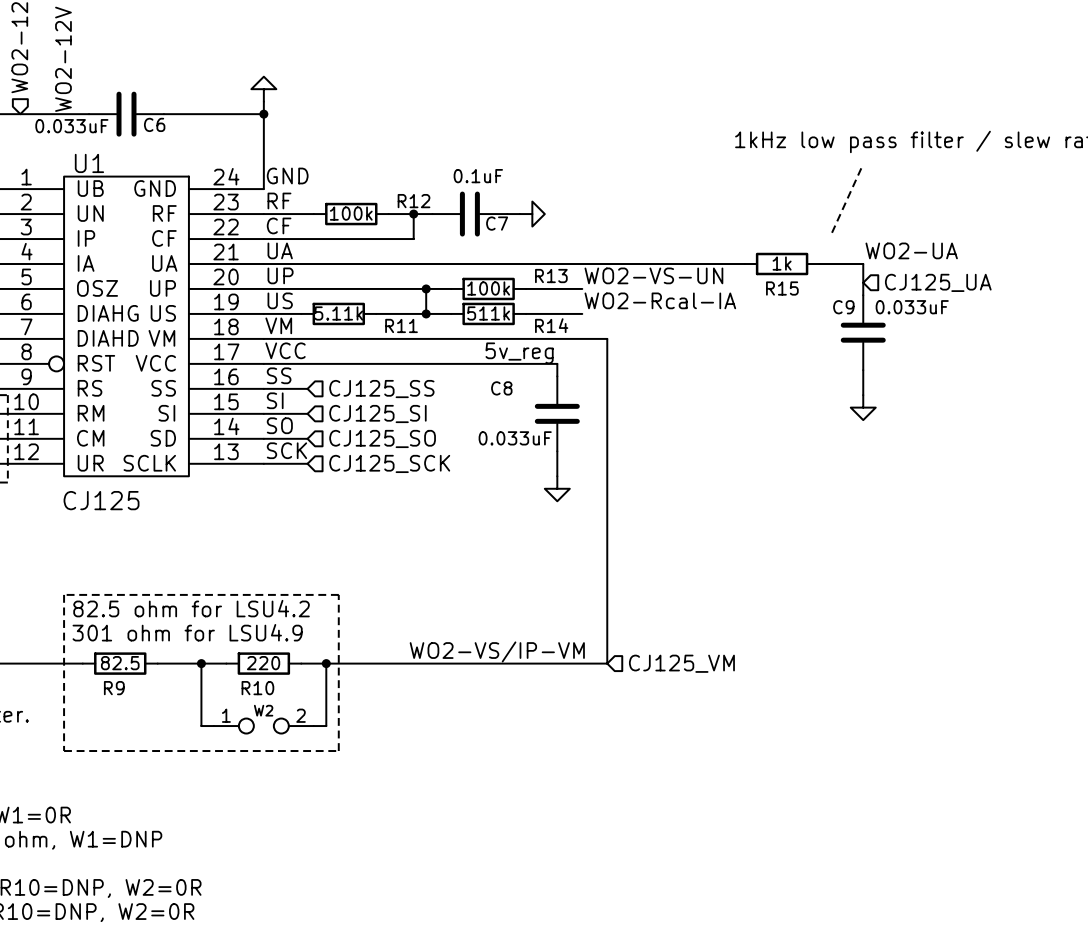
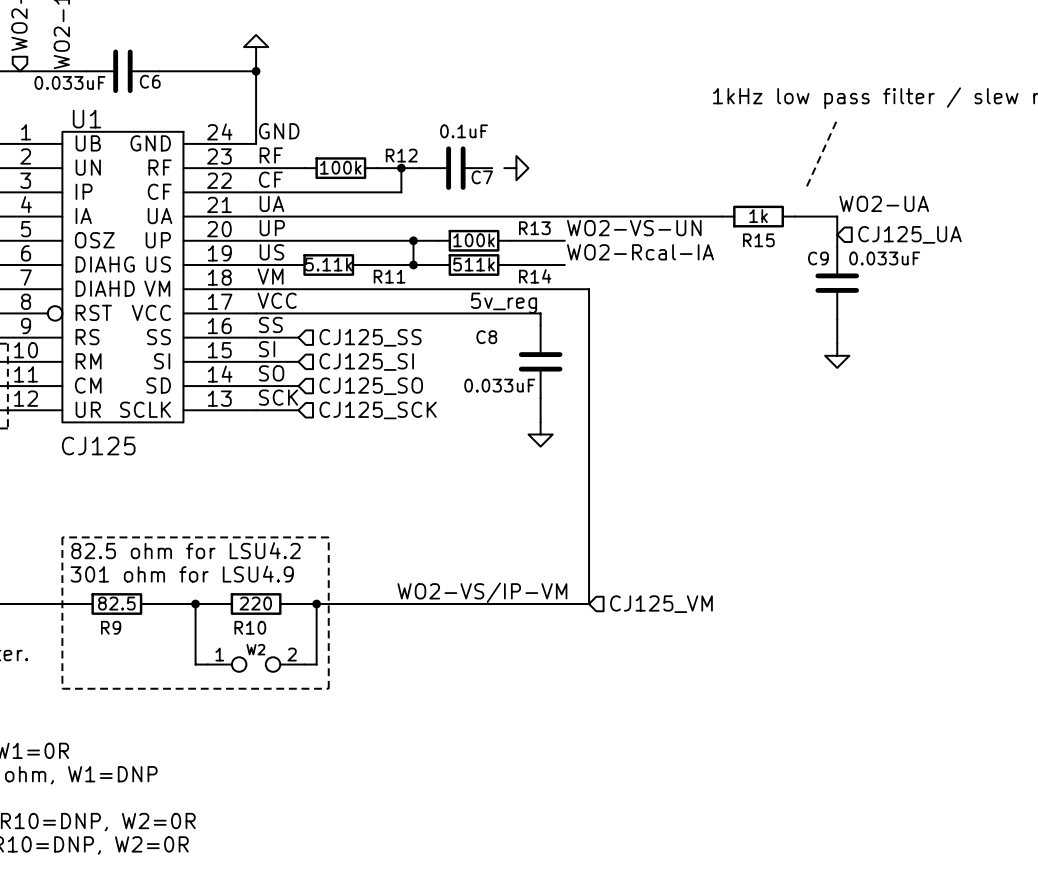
wire: (507, 214) (519, 214) -> none

